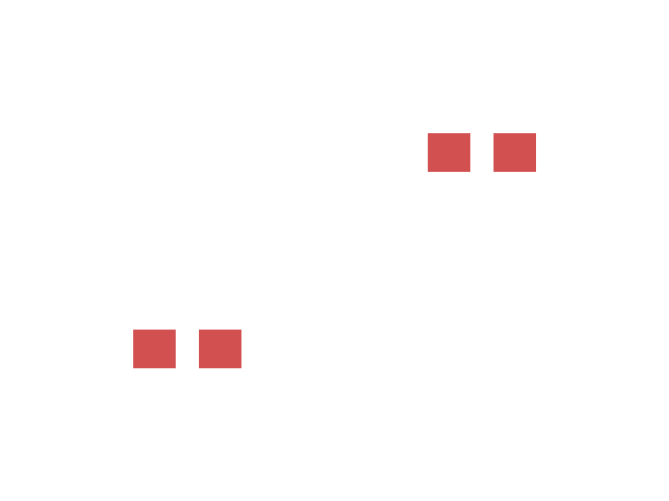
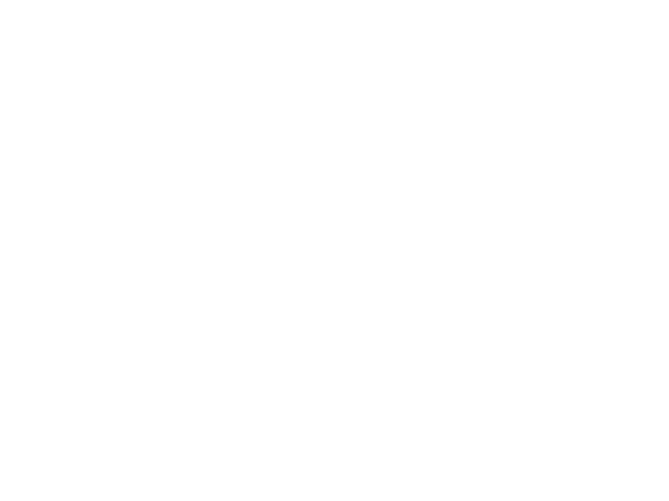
part: (481, 152) -> none
part: (187, 348) -> none

